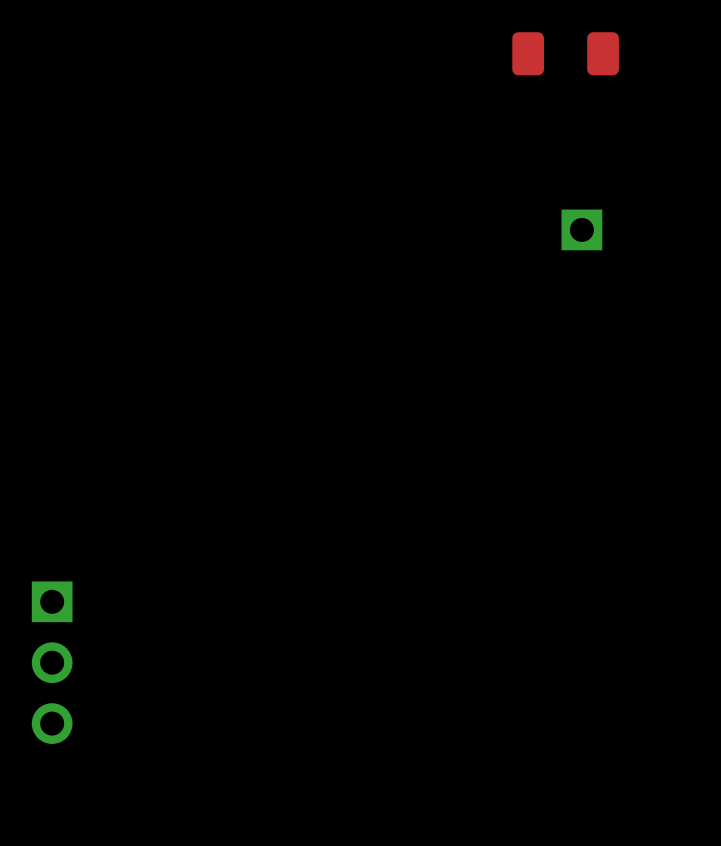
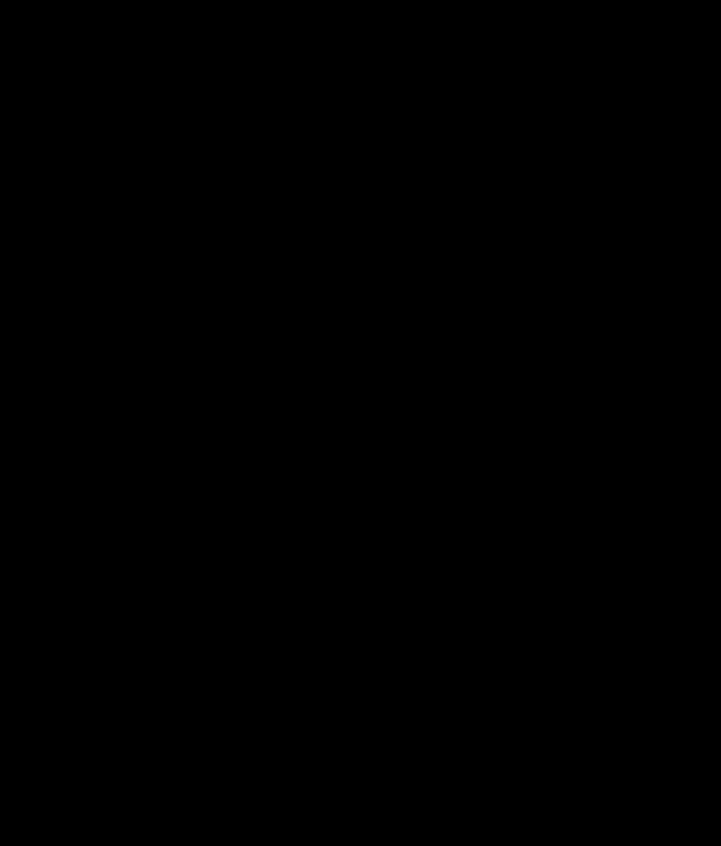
part: (565, 53) -> none
part: (581, 229) -> none
part: (52, 662) -> none

